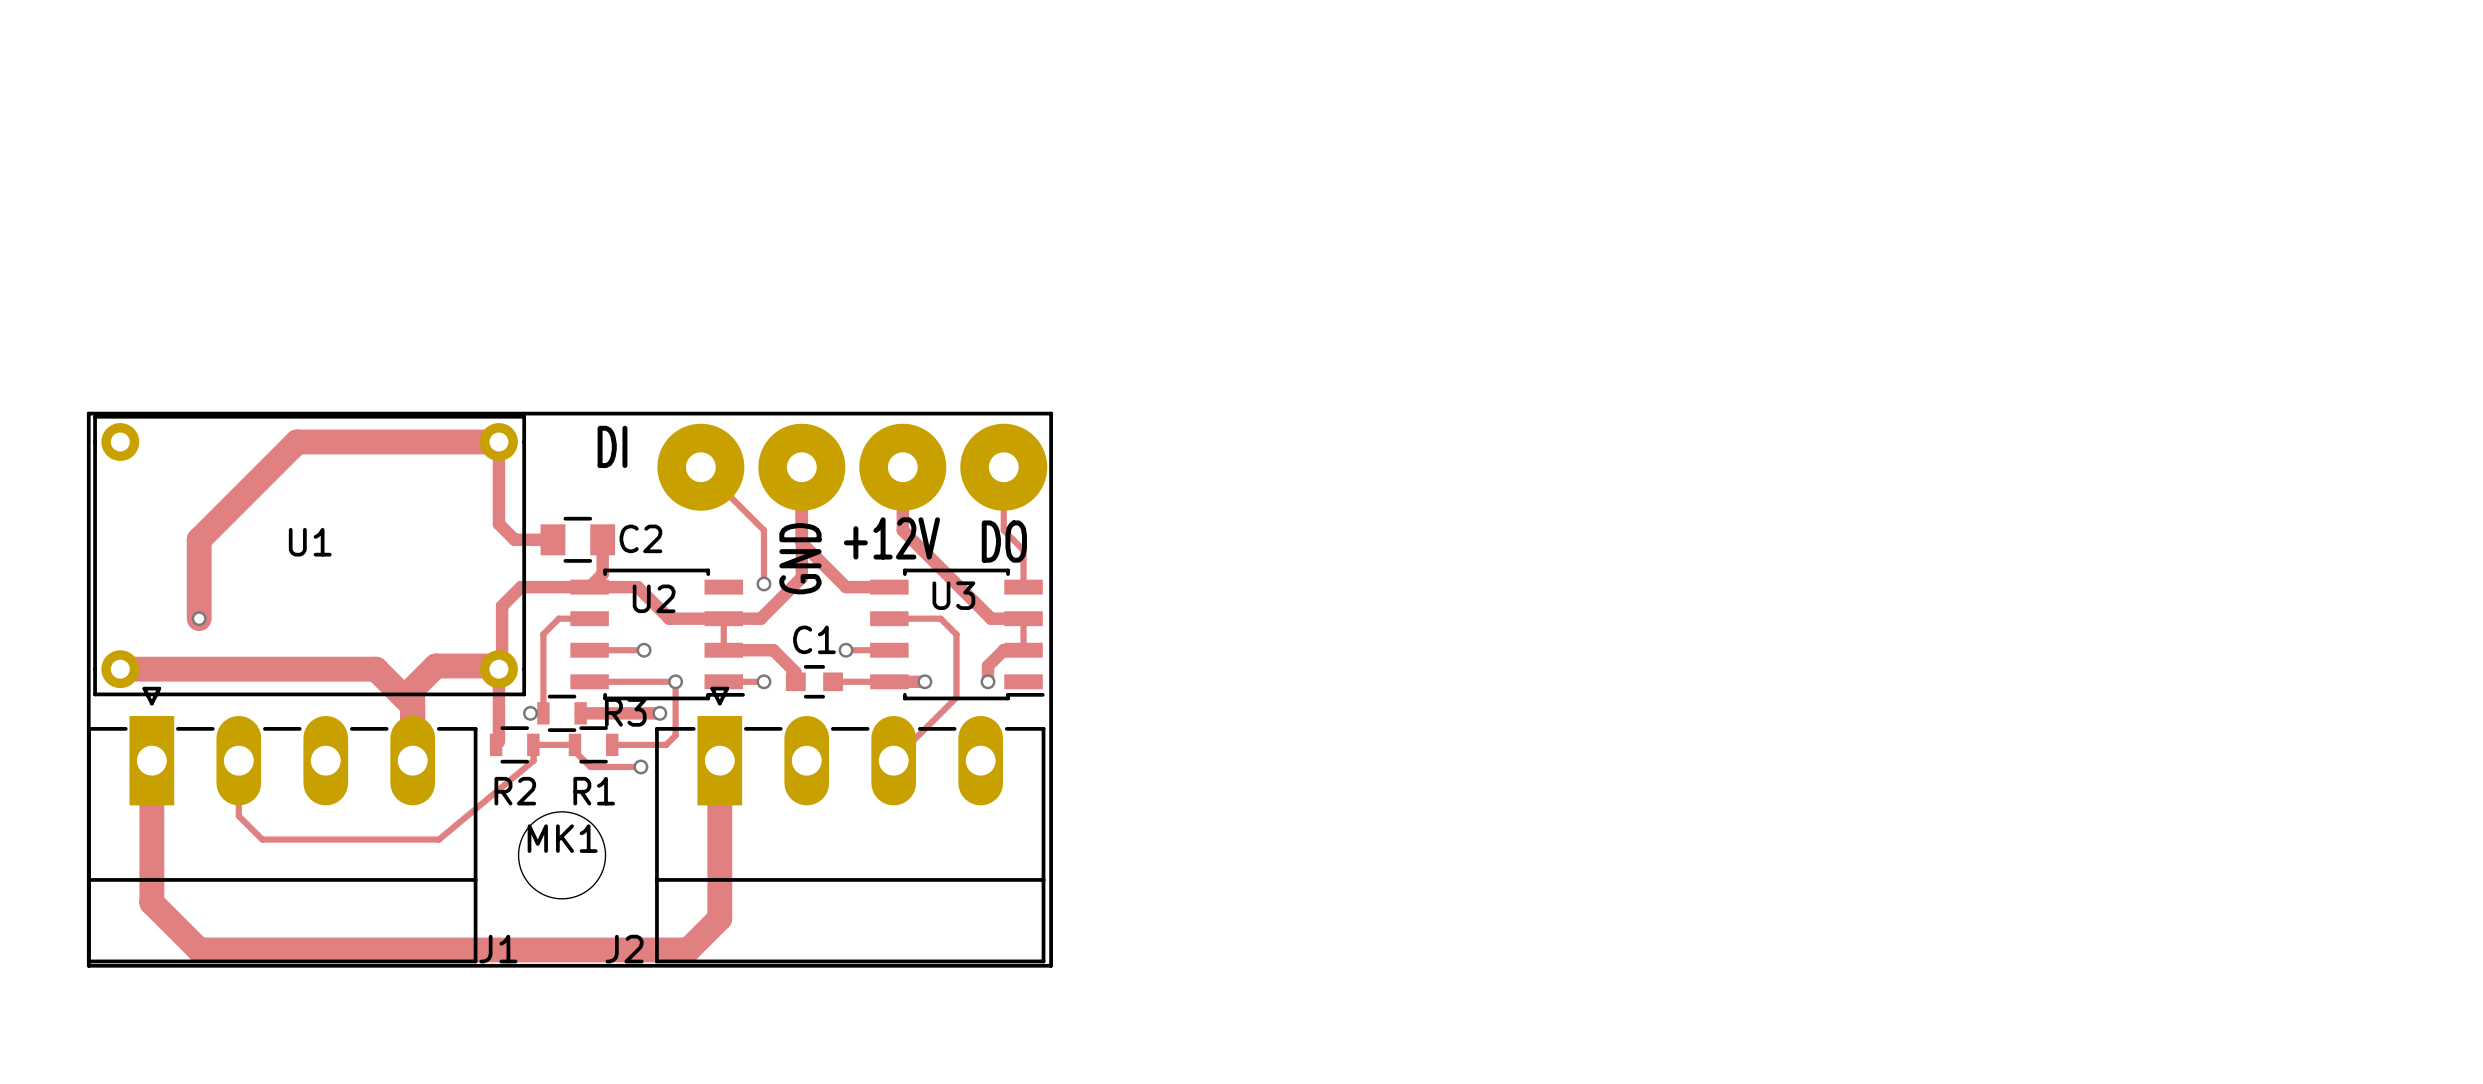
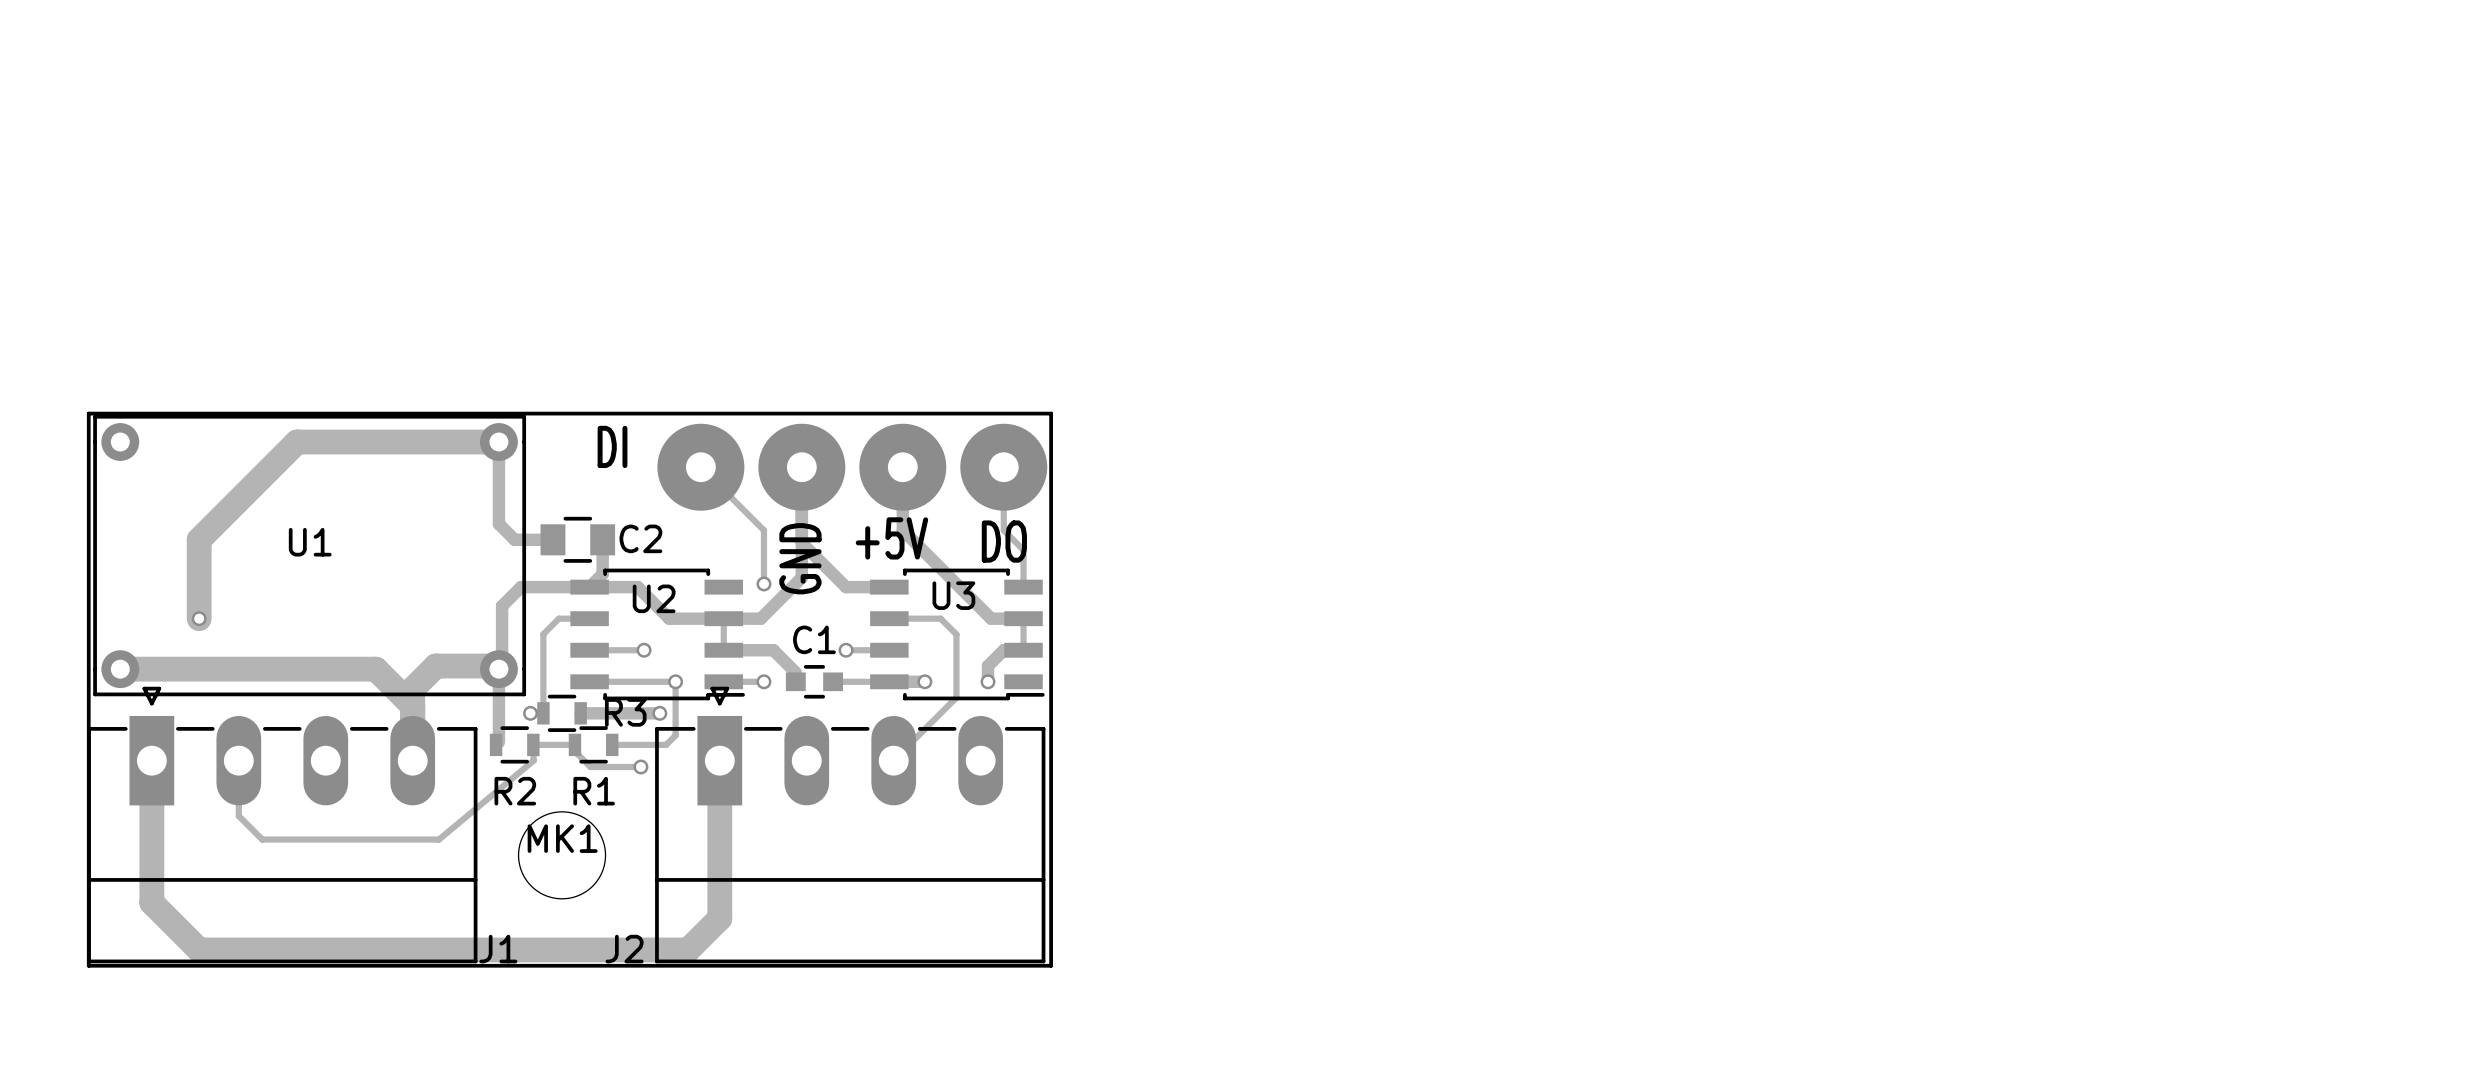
text: +12V (891, 538) -> +5V (891, 538)

